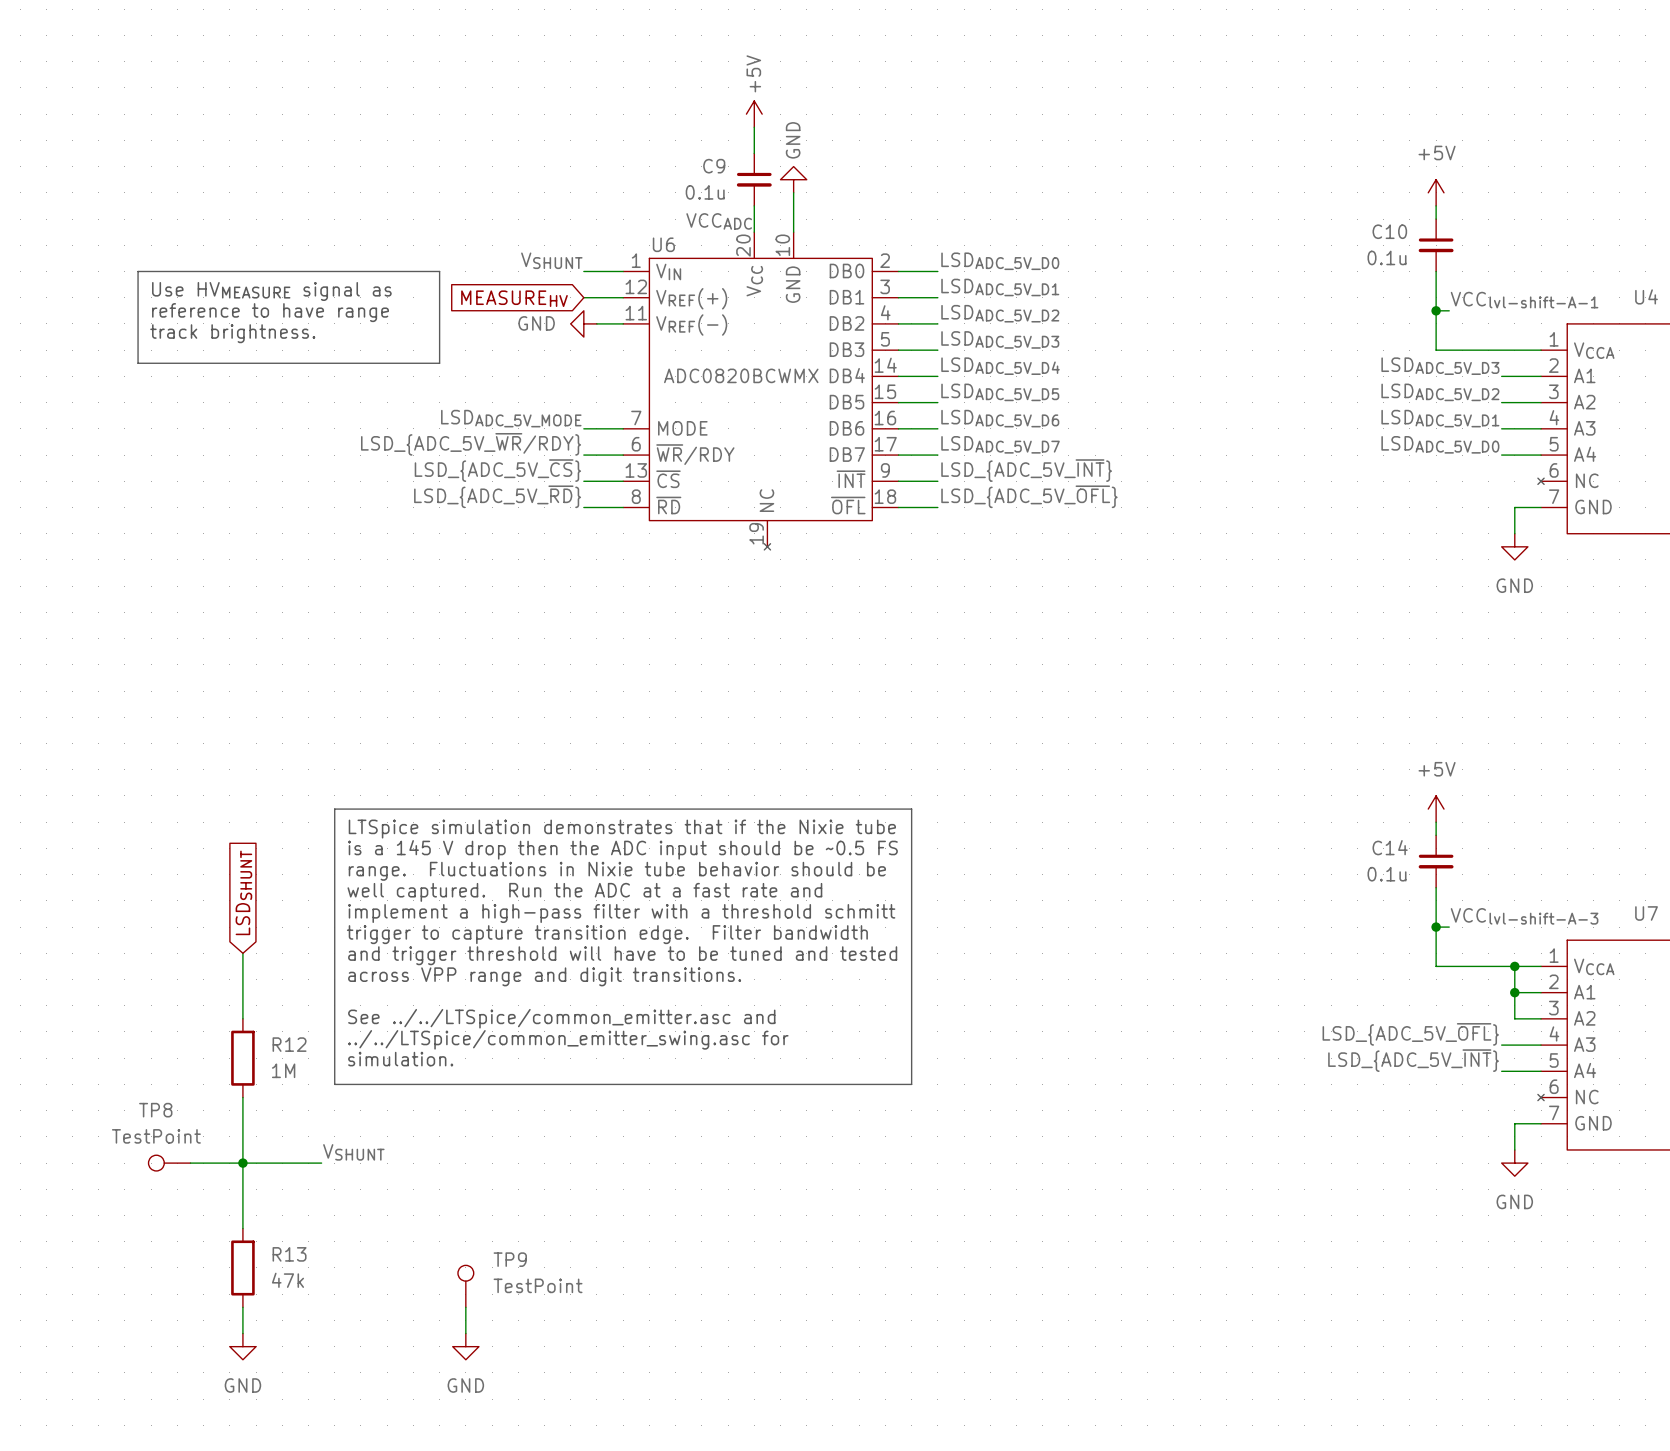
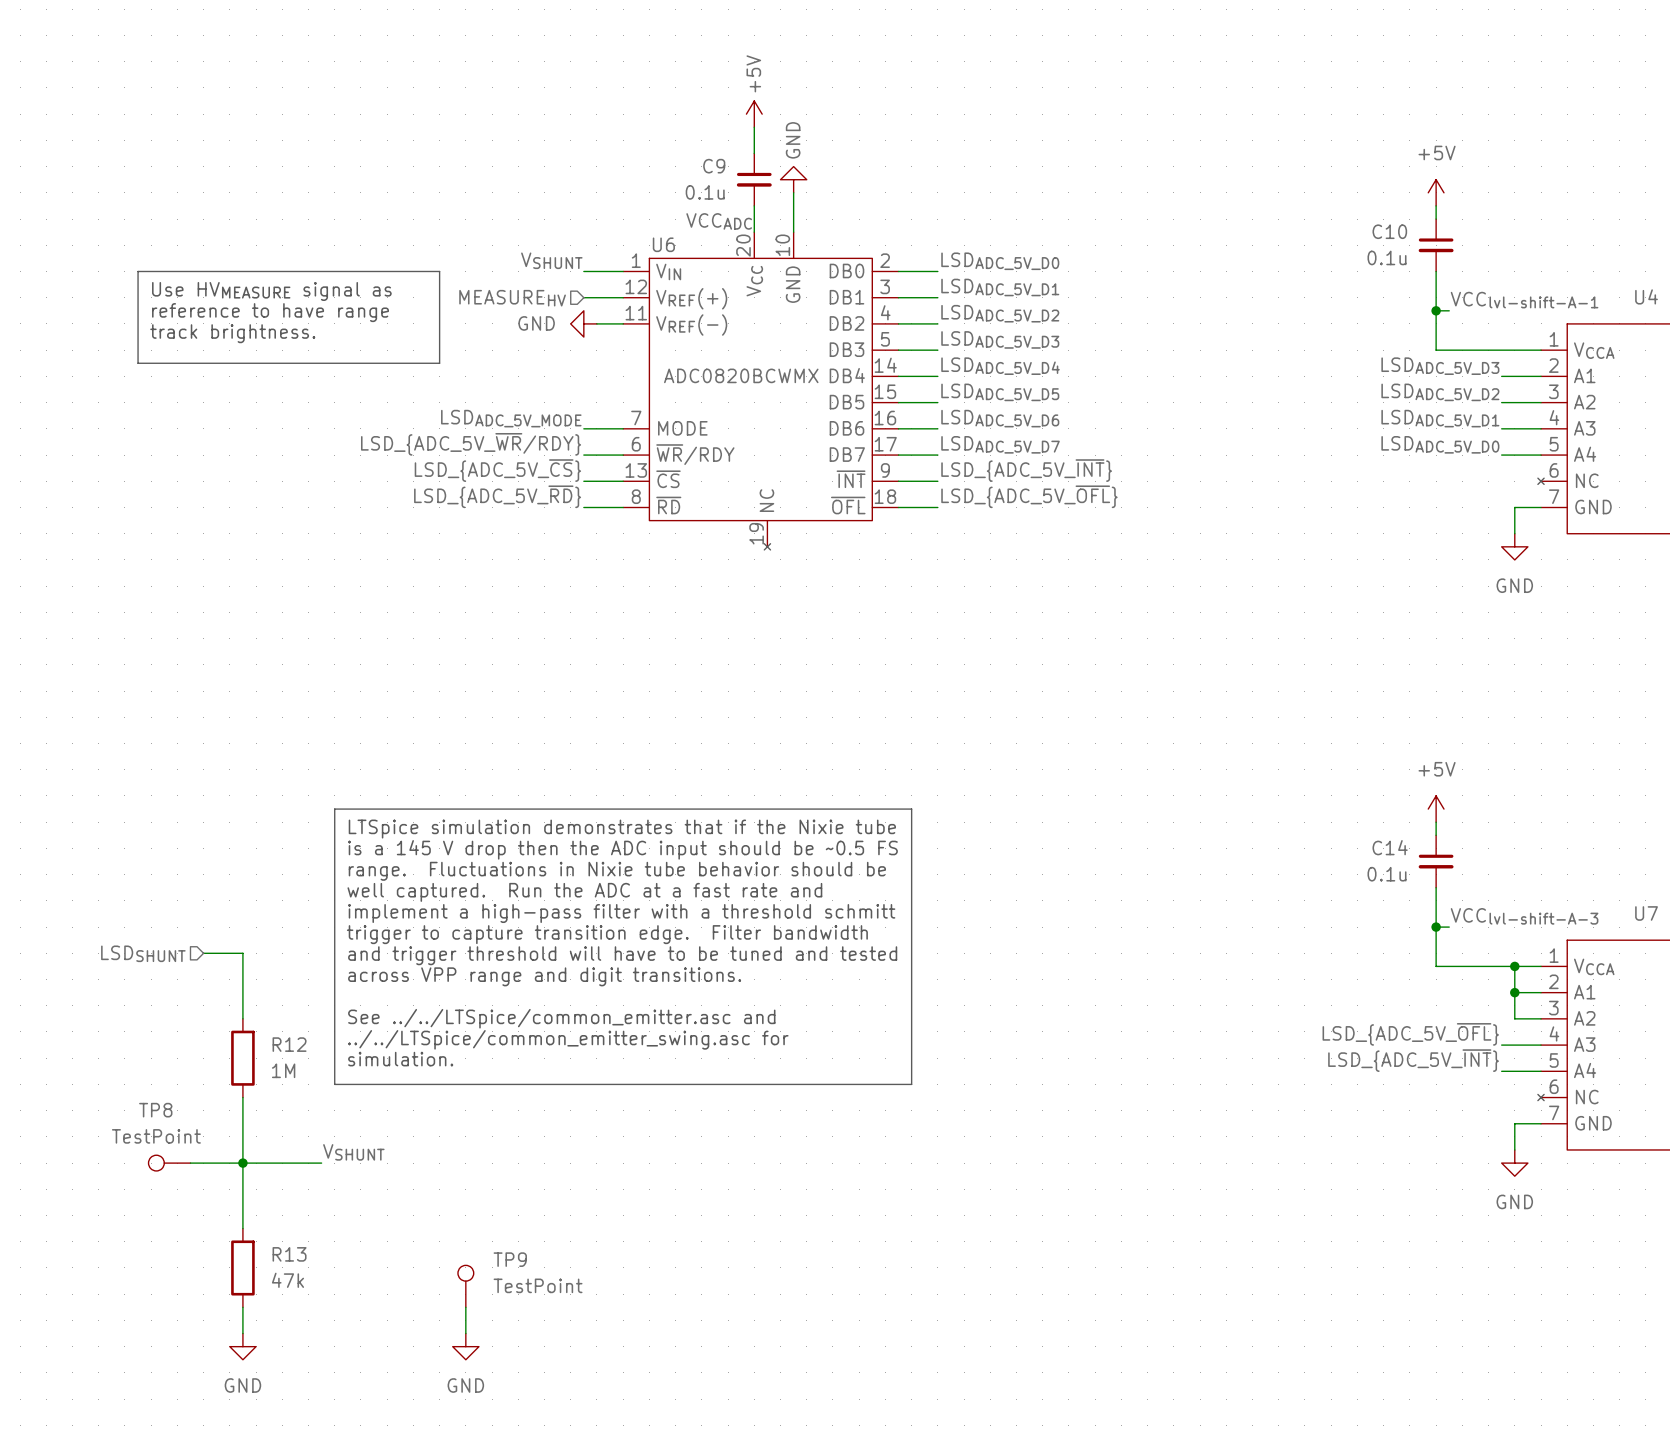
hierarchical label: none -> MEASUREHV (512, 298)
global label: MEASUREHV (514, 298) -> none
global label: LSDSHUNT (243, 892) -> none
hierarchical label: none -> LSDSHUNT (143, 953)
wire: none -> (203, 953) (242, 953)

